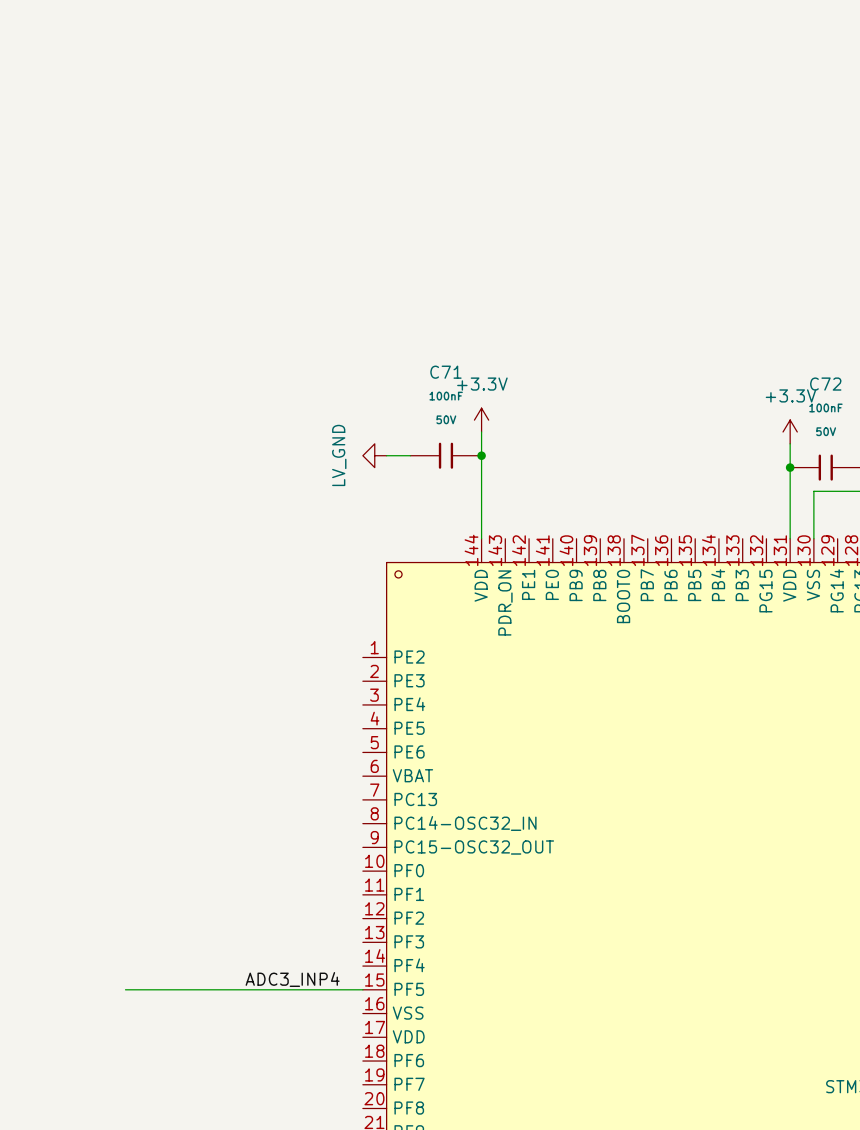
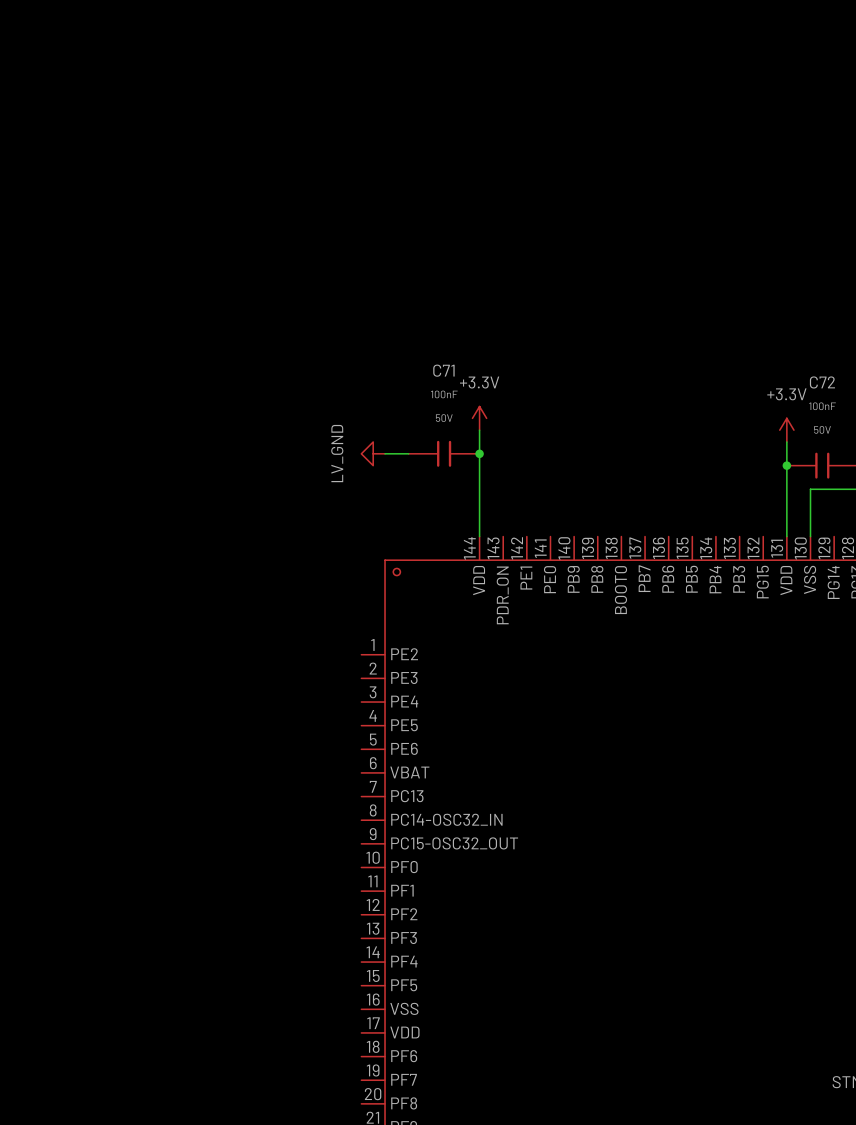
label: ADC3_INP4 (292, 979) -> none
wire: (125, 989) (362, 989) -> none

